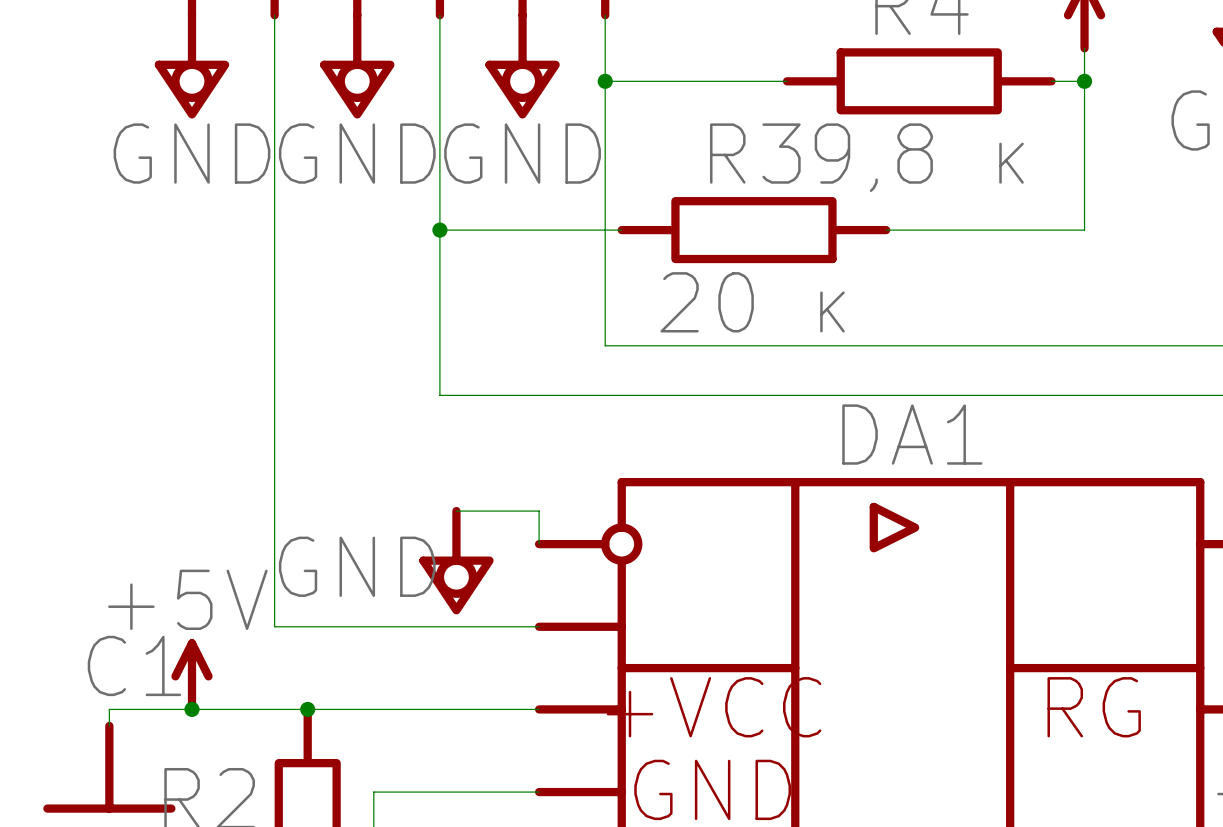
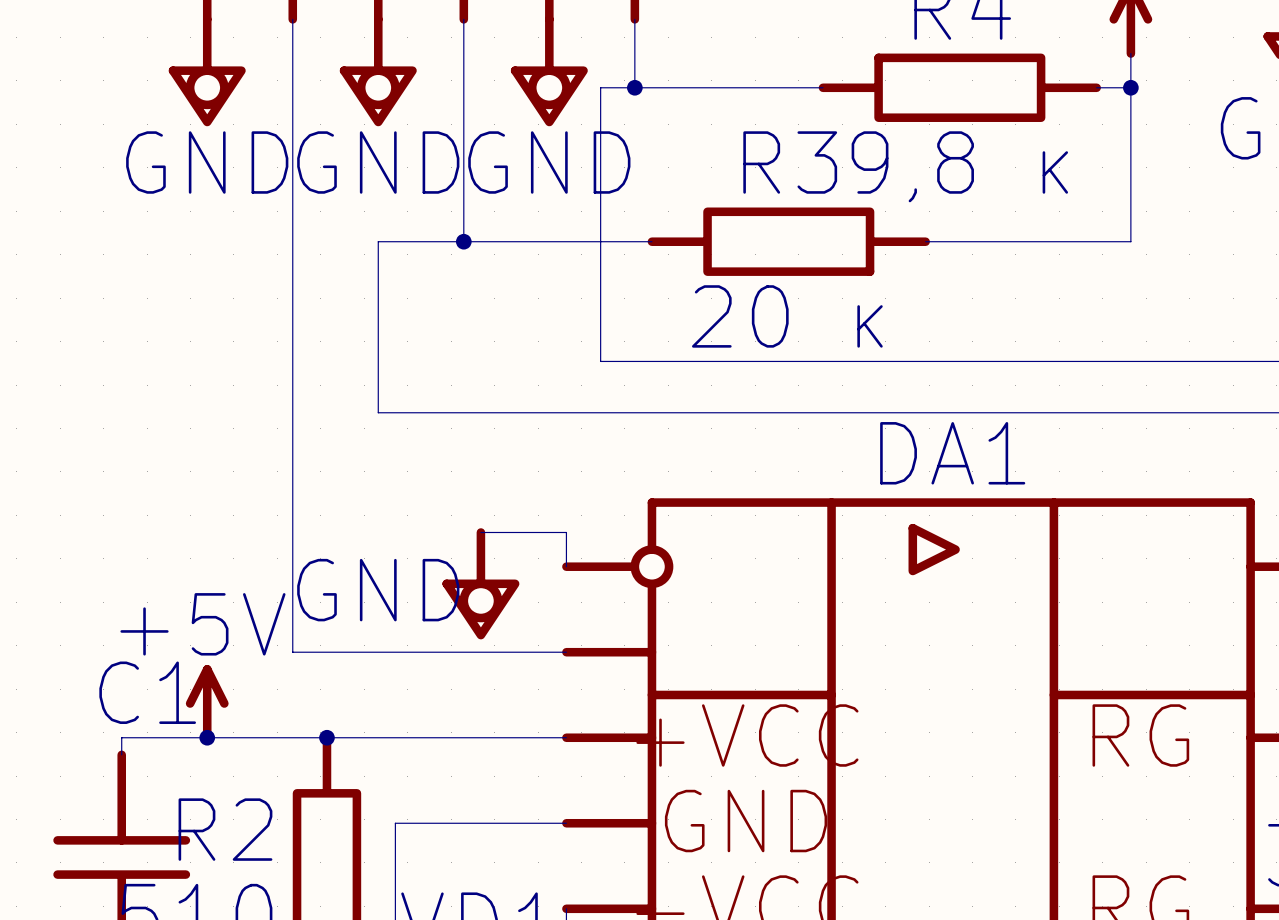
wire: (605, 81) (605, 345) -> (634, 87) (600, 87) (600, 361) (634, 361)
wire: (439, 230) (439, 395) -> (463, 241) (378, 241) (378, 412) (463, 412)

